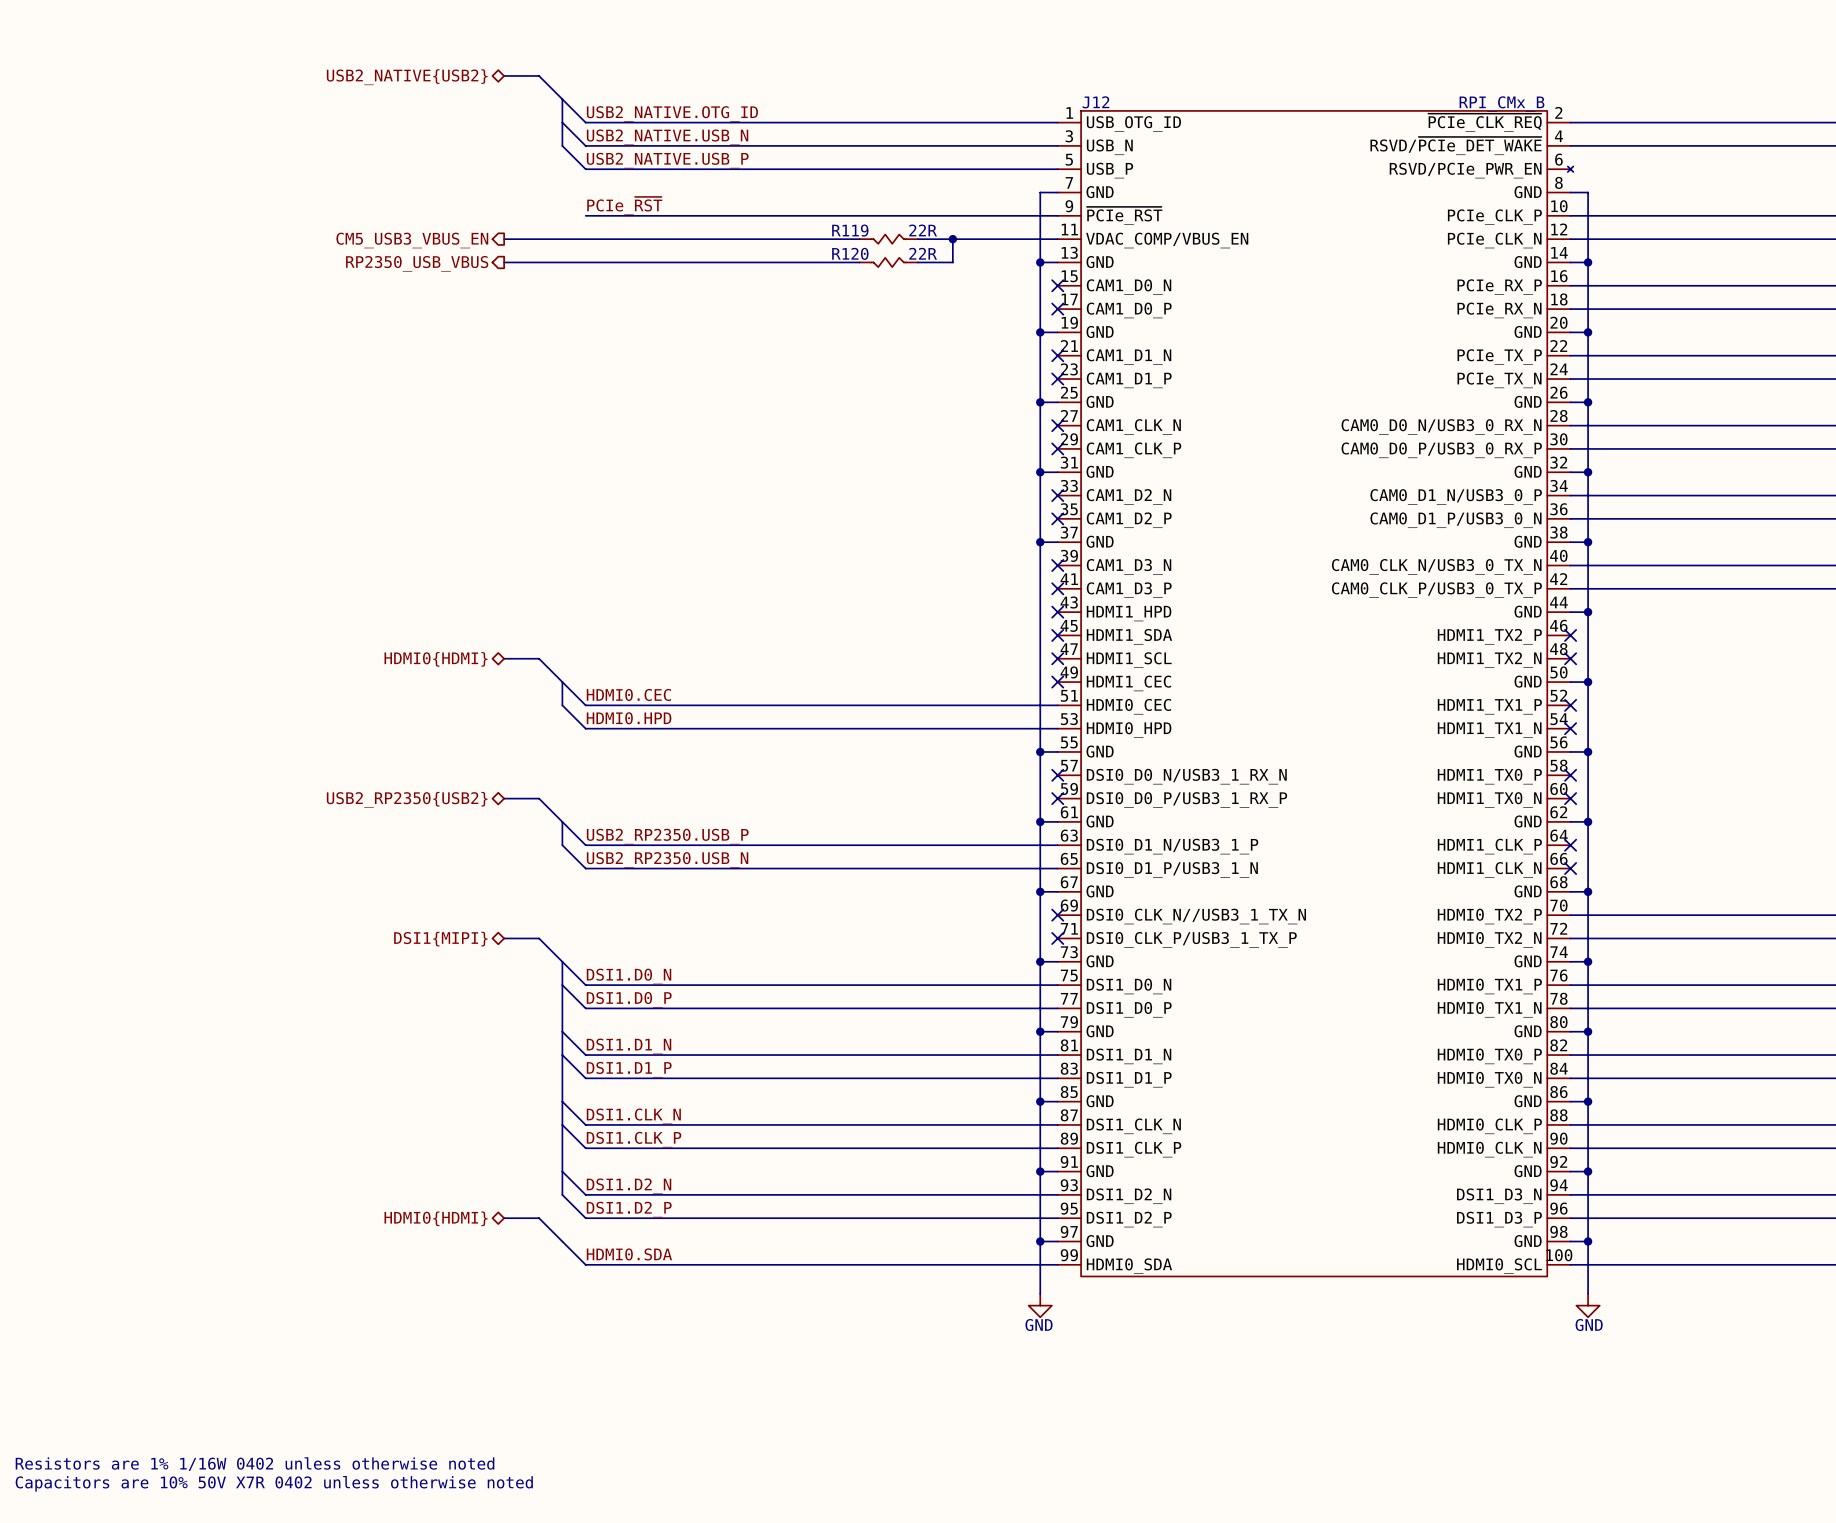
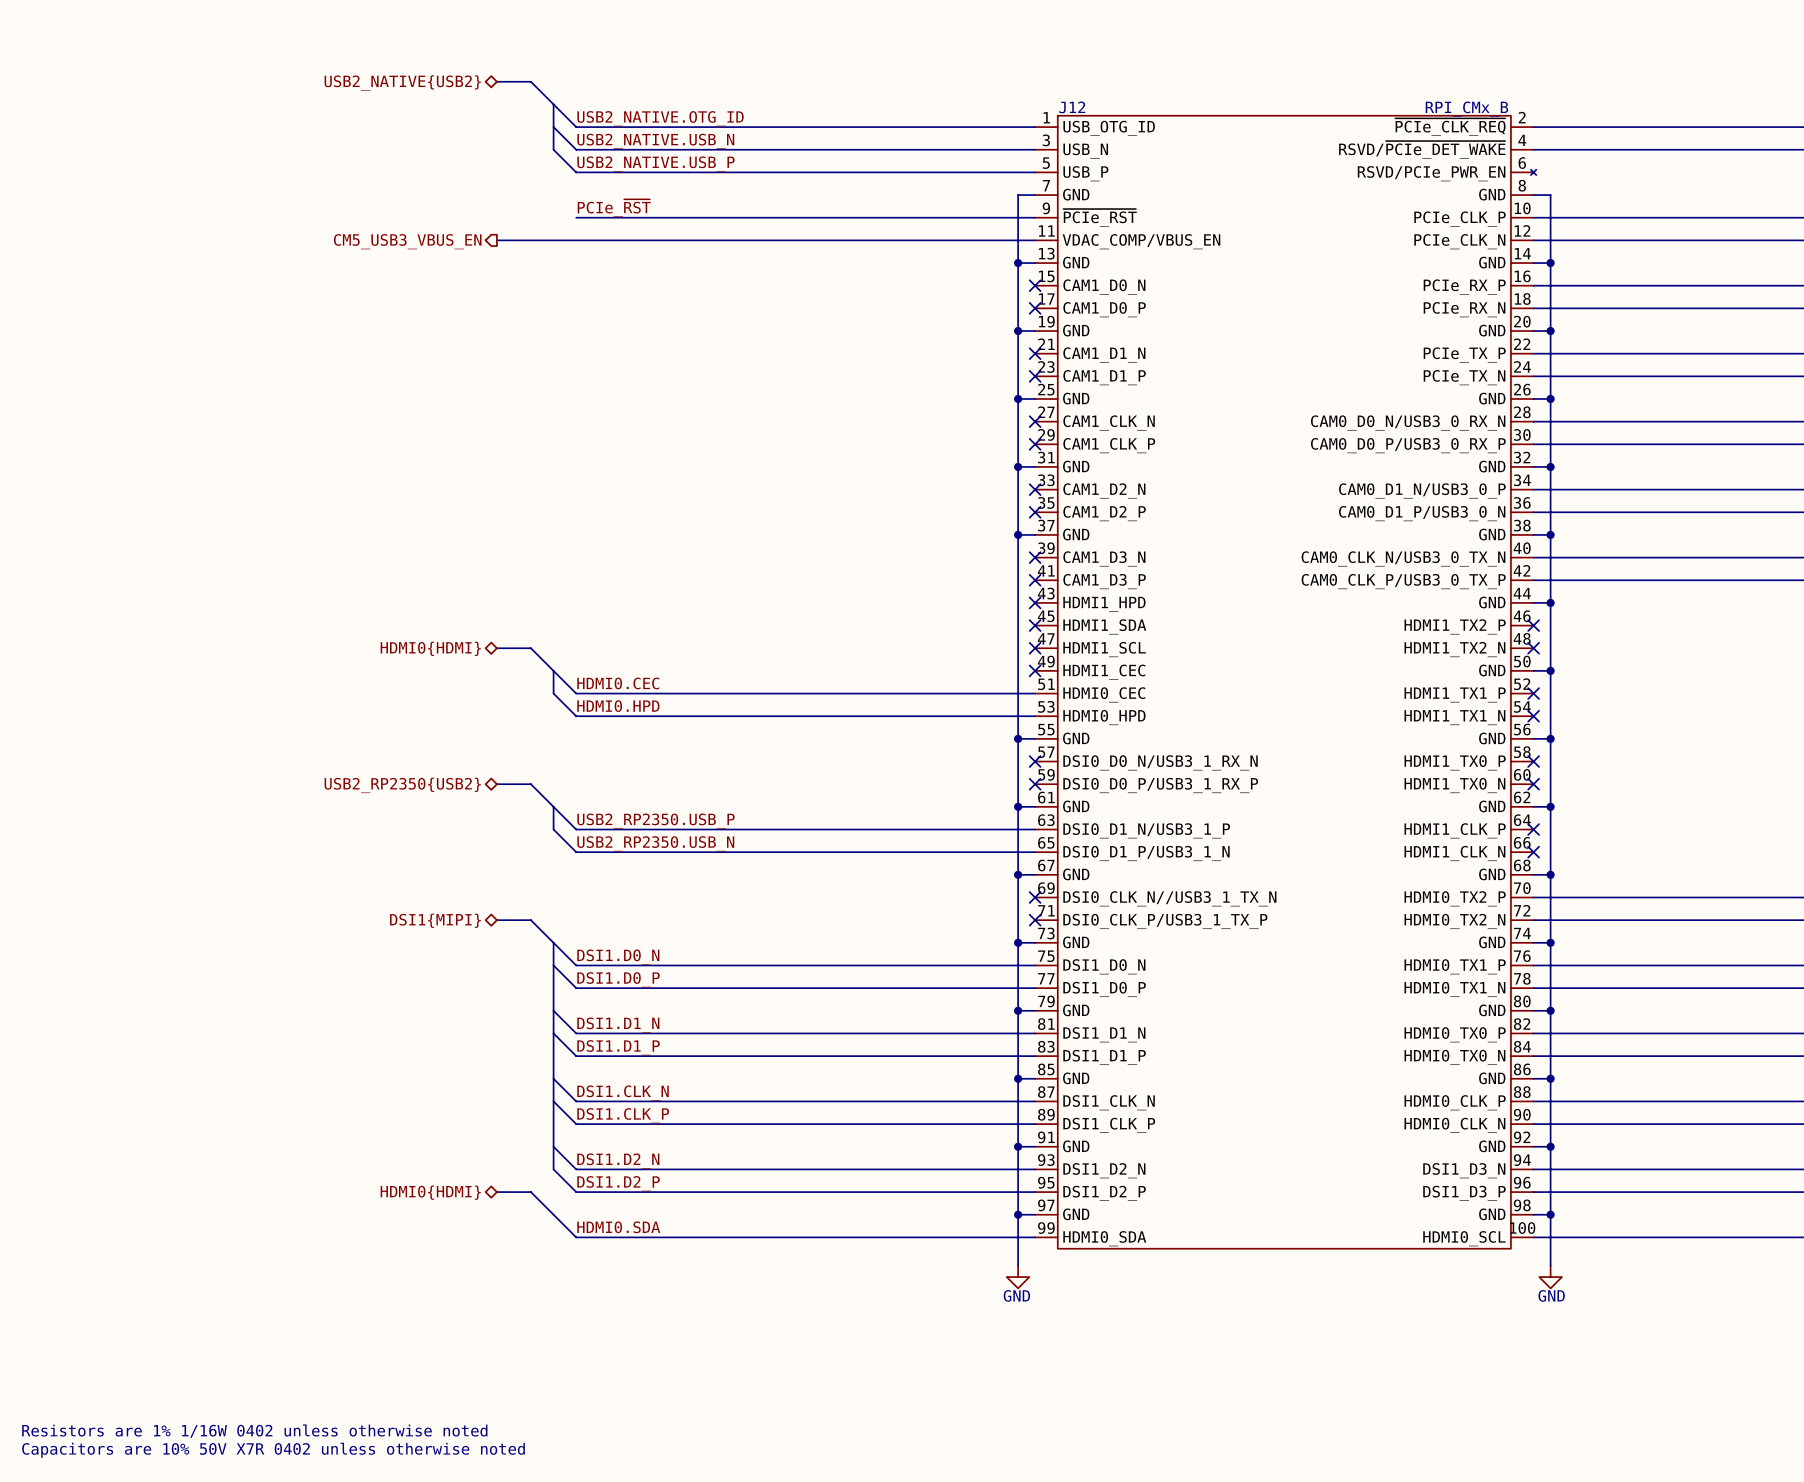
R119: 22R (888, 239) -> none
wire: (952, 239) (952, 262) (917, 262) -> none
junction: (952, 239) -> none
wire: (504, 262) (859, 262) -> none
R120: 22R (888, 262) -> none
hierarchical label: RP2350_USB_VBUS (417, 263) -> none

